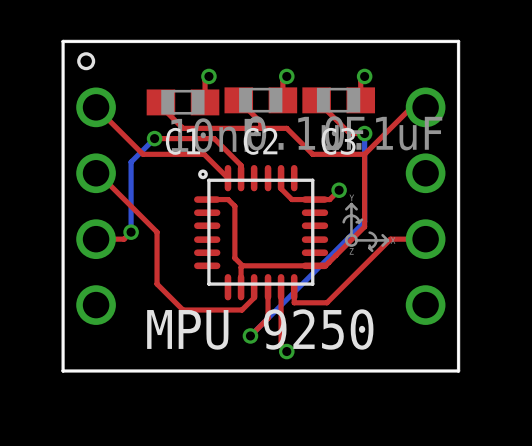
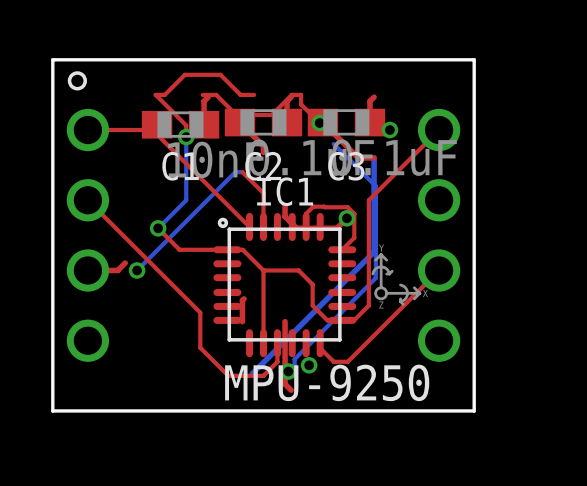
top track: none -> (202, 94) (216, 94) (236, 114) (271, 114) (291, 94) (301, 94) (301, 104) (319, 123)
top track: none -> (254, 94) (240, 94) (220, 74) (184, 74) (164, 94) (155, 94) (186, 125) (186, 137)
via: (208, 76) -> none
via: (286, 76) -> none
via: (364, 76) -> none
via: none -> (319, 123)
top track: (160, 102) (160, 106) (182, 128) (286, 128) (312, 154) (364, 154) -> none
top track: (96, 107) (143, 154) (204, 154) (227, 178) -> (87, 130) (152, 130) (249, 226)
via: none -> (389, 130)
top track: (425, 107) (411, 107) (364, 154) -> (439, 130) (368, 200) (368, 305) (354, 320) (327, 320) (312, 305) (312, 284) (298, 270) (263, 270)
bottom track: none -> (186, 137) (186, 200) (158, 228)
via: none -> (186, 137)
bottom track: none -> (333, 144) (375, 186) (375, 278) (294, 359) (294, 365) (288, 371)
via: (364, 133) -> none
top track: (154, 138) (214, 138) (241, 165) (241, 178) -> none
bottom track: (154, 138) (131, 162) (131, 232) -> none
via: (154, 138) -> none
top track: none -> (242, 172) (263, 193) (263, 226)
bottom track: none -> (242, 172) (235, 172) (137, 270)
top track: (364, 154) (364, 226) (325, 265) (242, 265) (234, 258) (234, 206) (228, 199) (207, 199) -> none
top track: (96, 173) (157, 232) (157, 284) (182, 310) (241, 310) (254, 297) (254, 287) -> (87, 200) (200, 312) (200, 347) (228, 375) (263, 375) (277, 361) (277, 343)
top track: none -> (306, 226) (306, 213) (313, 206) (347, 207) (354, 213) (354, 237) (342, 249)
top track: none -> (158, 228) (179, 249) (242, 249) (263, 270)
via: none -> (158, 228)
via position: (131, 232) -> (137, 270)
part: (291, 232) -> none
top track: none -> (263, 270) (263, 343)
top track: (425, 239) (390, 239) (326, 302) (294, 302) (294, 287) -> (439, 270) (347, 361) (333, 361) (320, 348) (320, 343)
IC1: none -> (317, 285)
top track: (268, 287) (268, 318) (250, 335) -> none
via: none -> (309, 365)
text: MPU 9250 (260, 329) -> MPU-9250 (327, 382)
via: none -> (288, 371)
via: (250, 335) -> none
via: (286, 351) -> none

